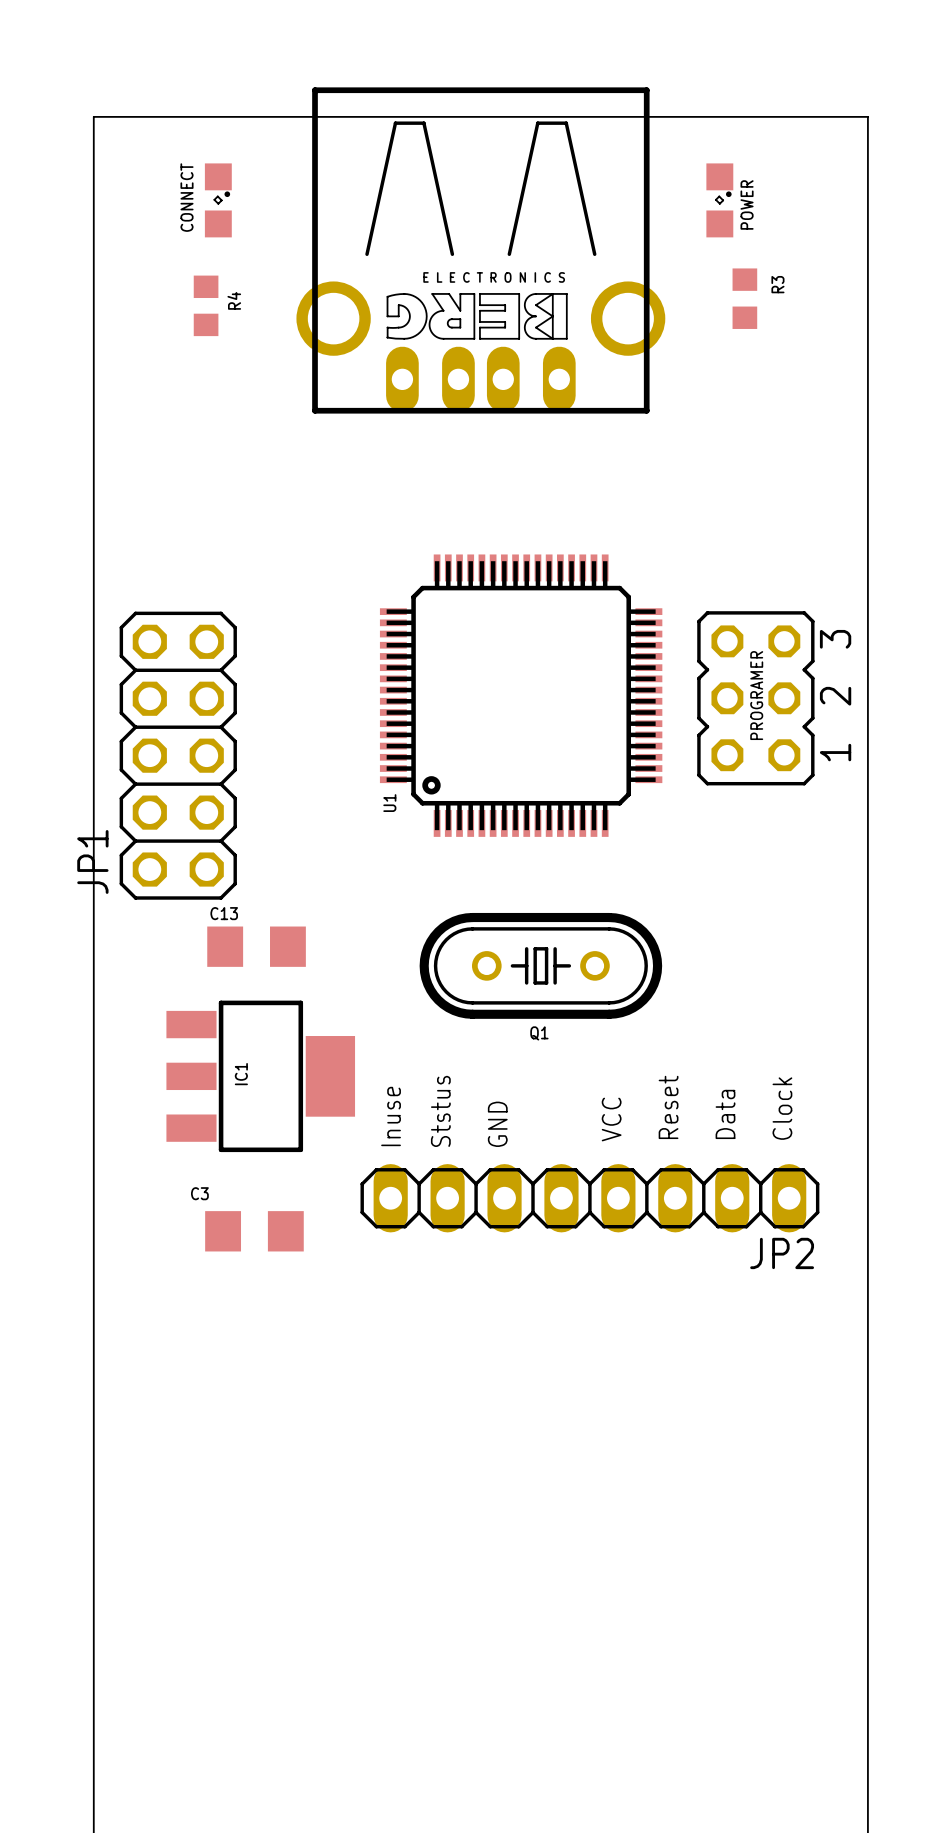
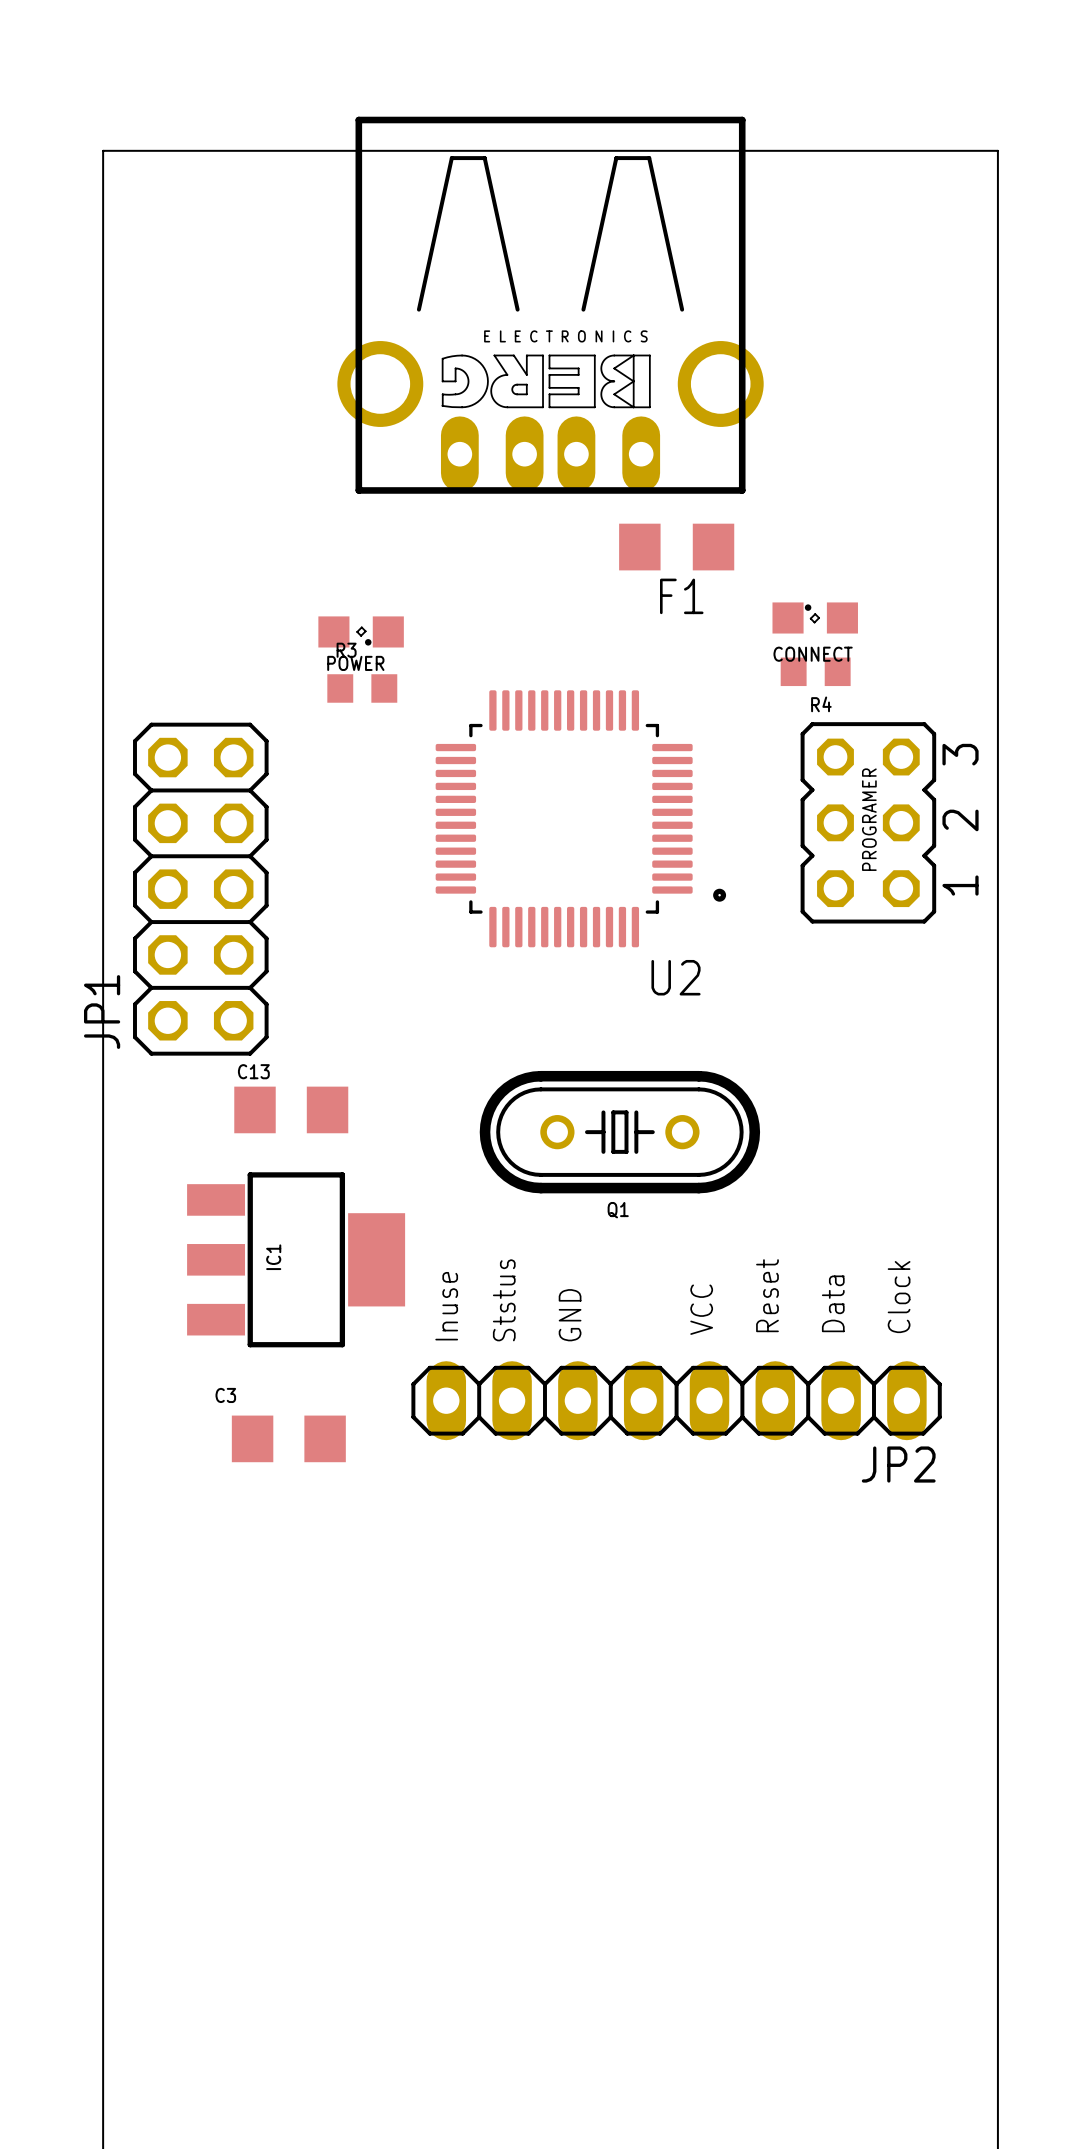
CONNECT: (218, 200) -> none
POWER rotation: 0° (719, 200) -> 90° clockwise (361, 631)
POWER position: (719, 200) -> (361, 631)
R3 name position: R3 (777, 284) -> R3 (346, 650)
R3 rotation: 0° (744, 298) -> 90° clockwise (362, 688)
R3 position: (744, 298) -> (362, 688)
R4 rotation: 0° (206, 305) -> 90° clockwise (815, 671)
R4 position: (206, 305) -> (815, 671)
F1: none -> (676, 547)
CONNECT: none -> (815, 617)
U2: none -> (580, 818)
U1: (521, 695) -> none

